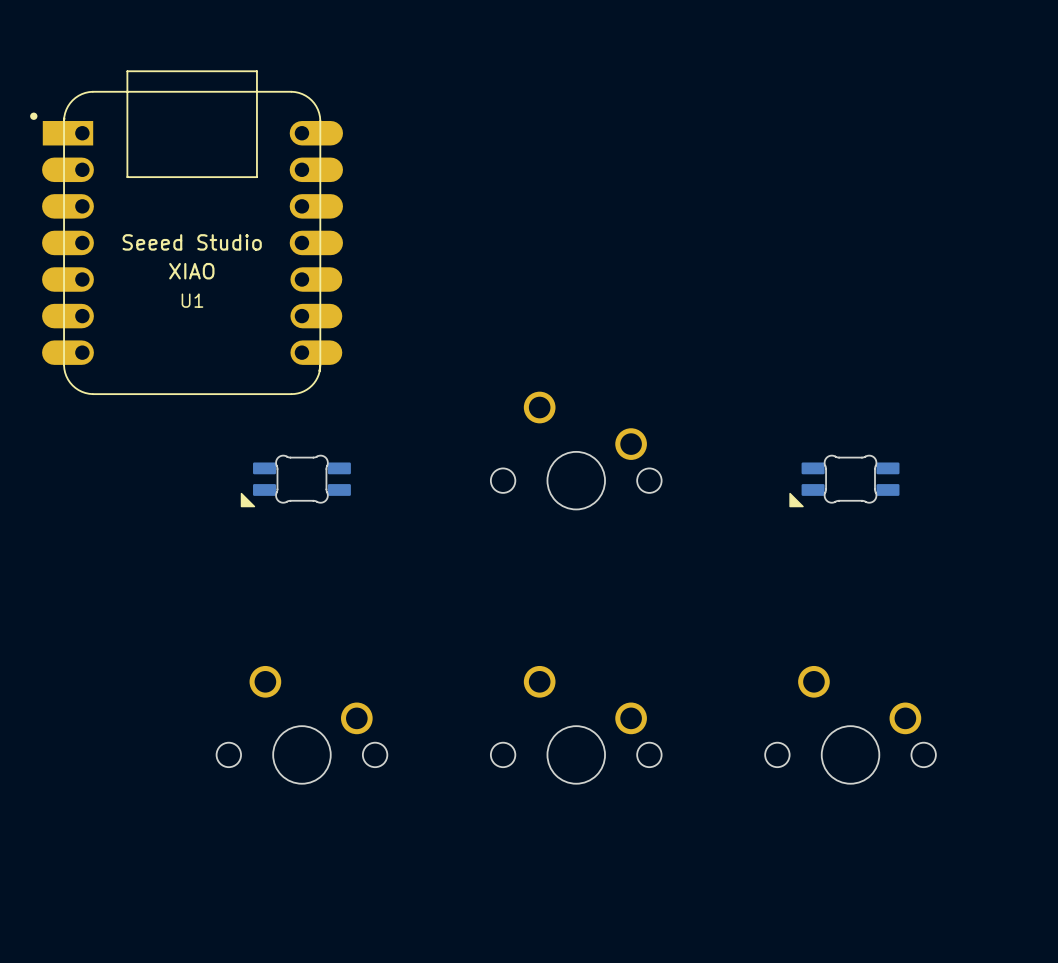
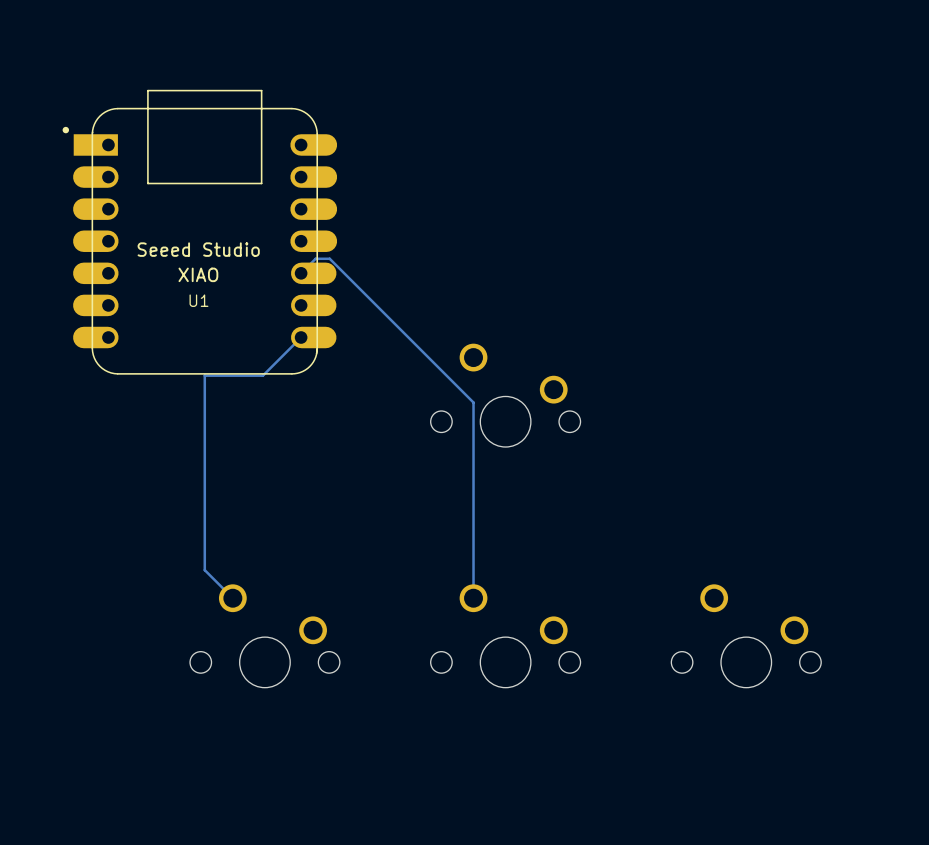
U1 footprint: [30, 70, 343, 396] -> [62, 89, 338, 375]
track: none -> (301, 273) (315, 258) (329, 258) (473, 402) (473, 598)
track: none -> (301, 337) (262, 375) (204, 375) (204, 570) (232, 598)
part: (295, 481) -> none
part: (844, 481) -> none

